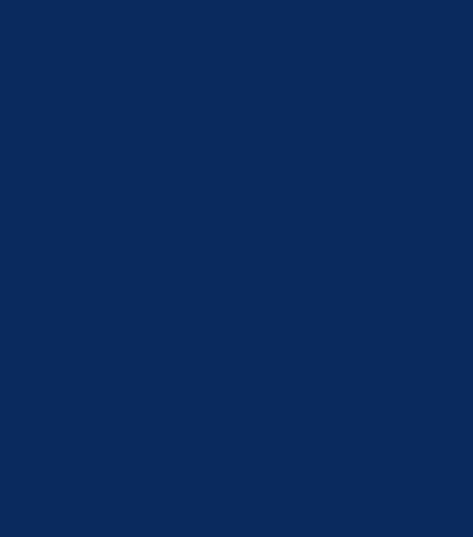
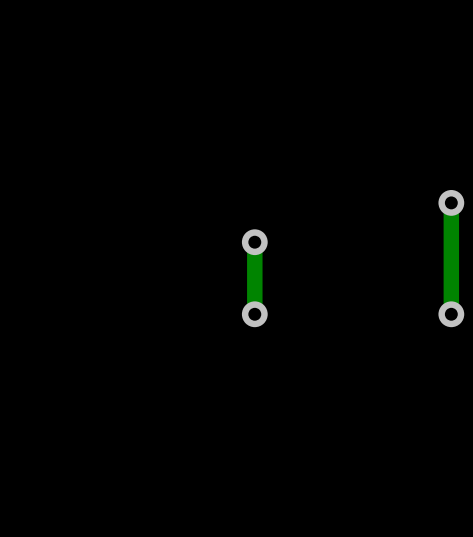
track: none -> (451, 202) (451, 314)
via: none -> (451, 202)
track: none -> (254, 242) (254, 314)
via: none -> (254, 242)
via: none -> (254, 314)
via: none -> (451, 314)

